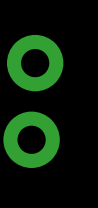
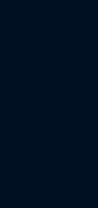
part: (35, 63) -> none
part: (31, 139) -> none

